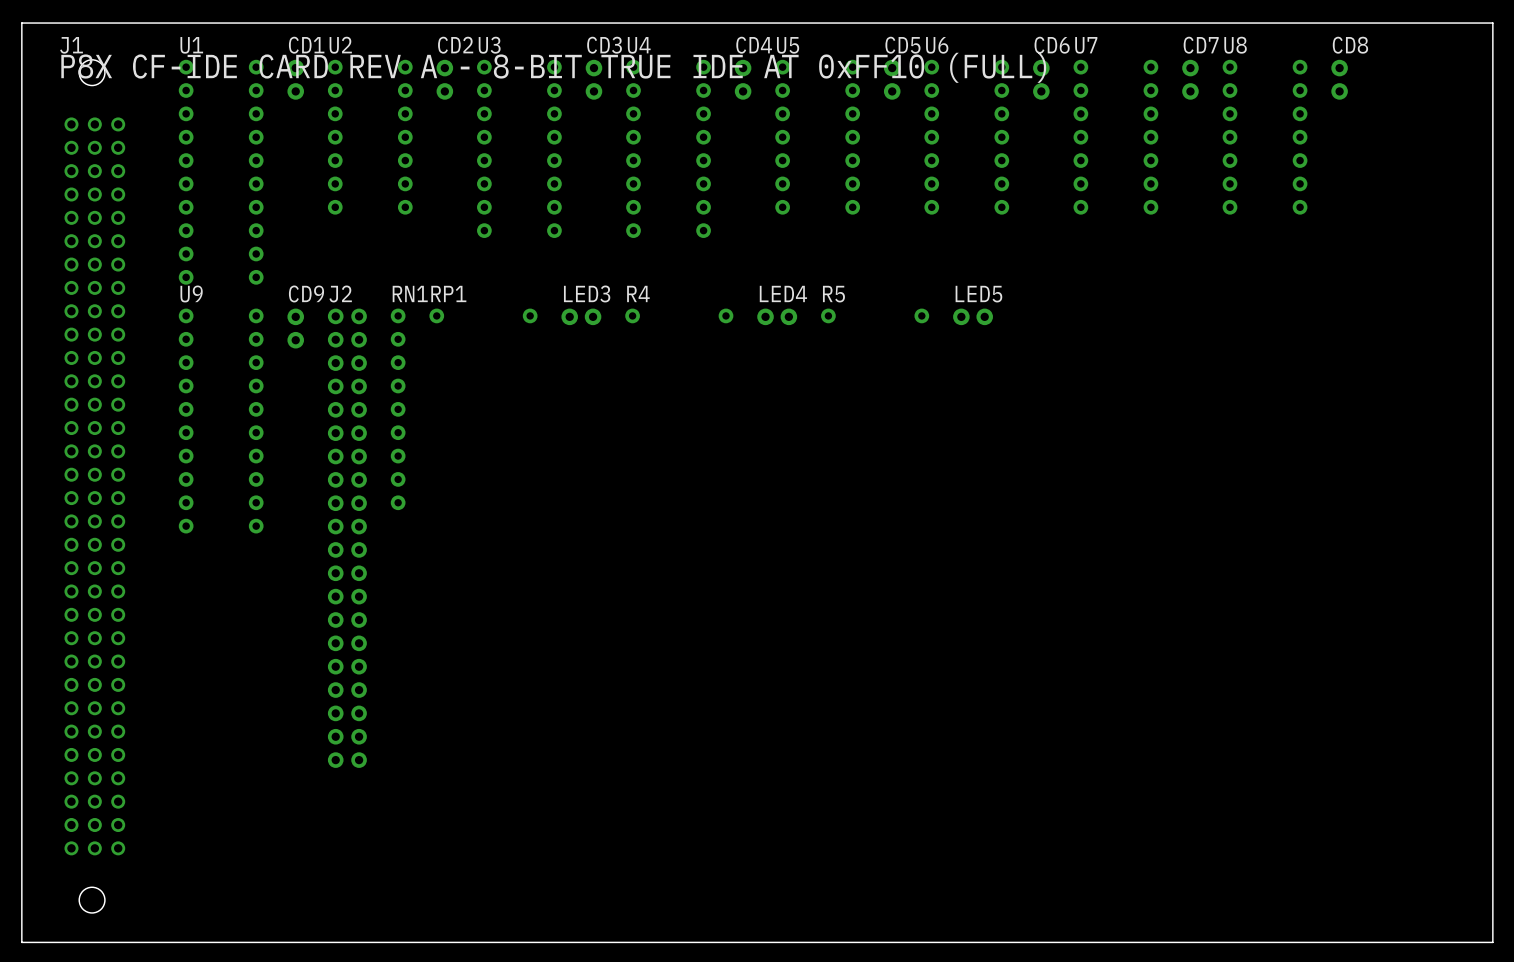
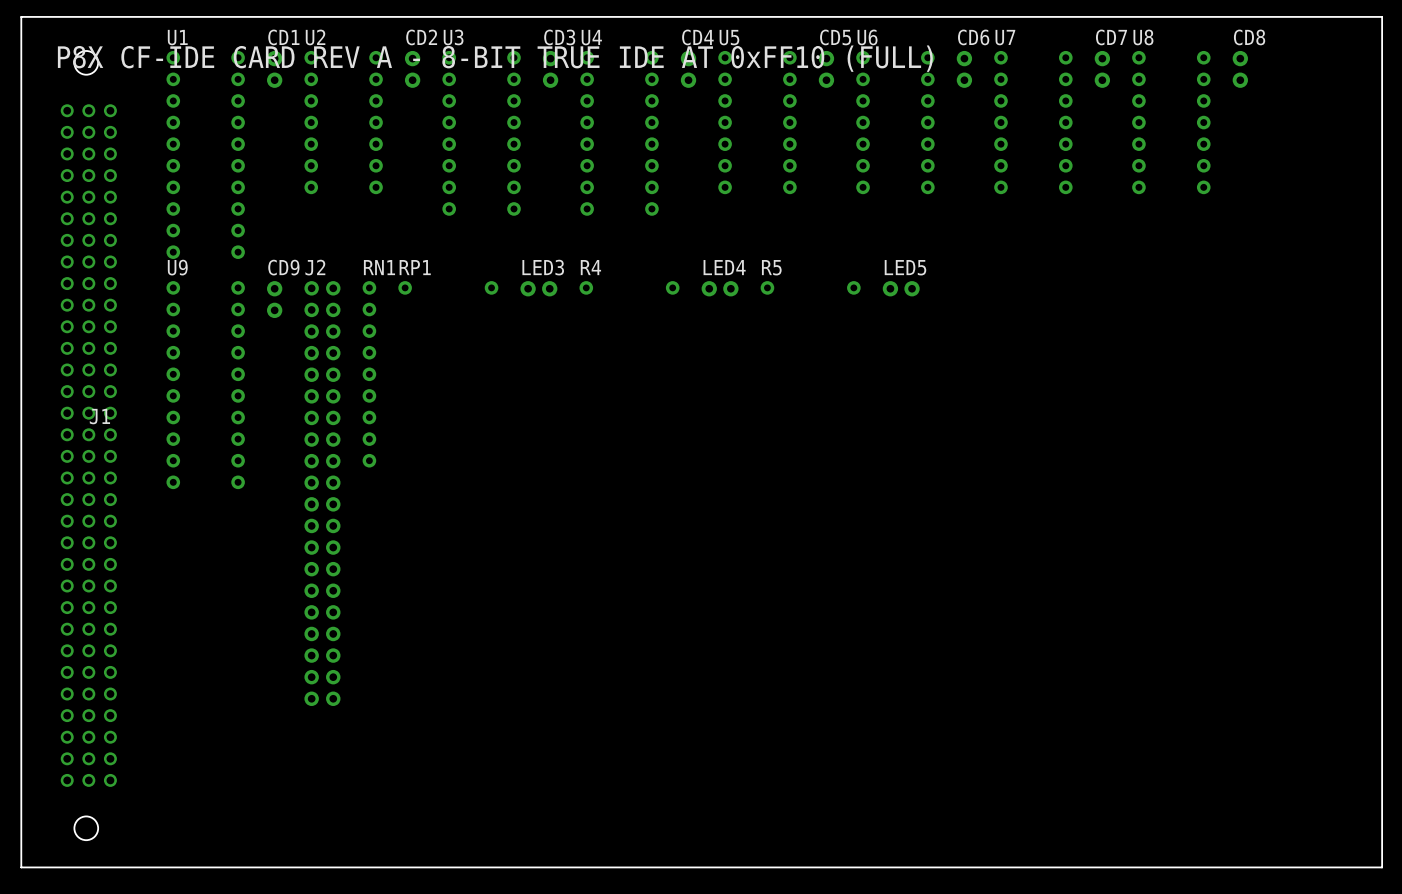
J1 name position: J1 (71, 45) -> J1 (99, 416)

